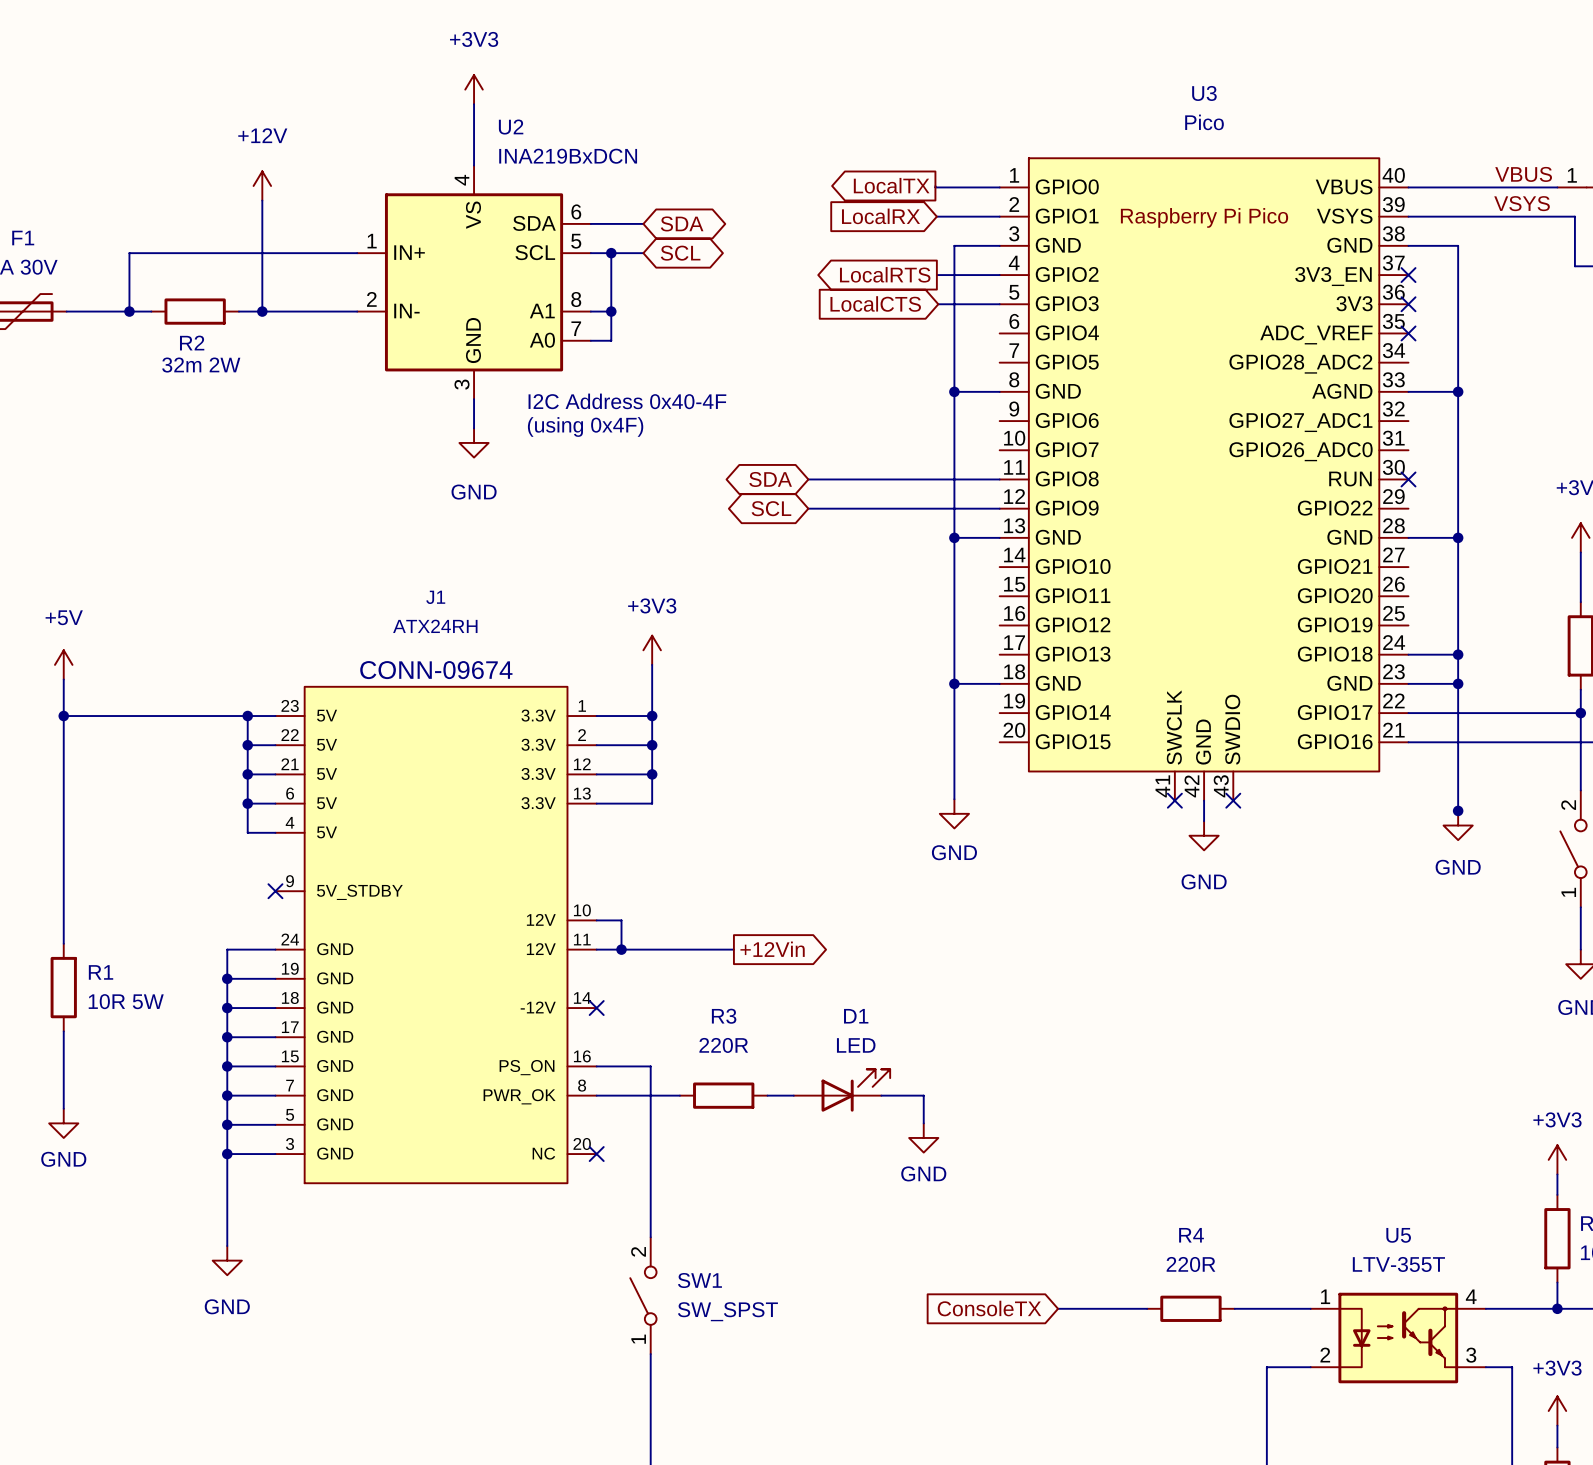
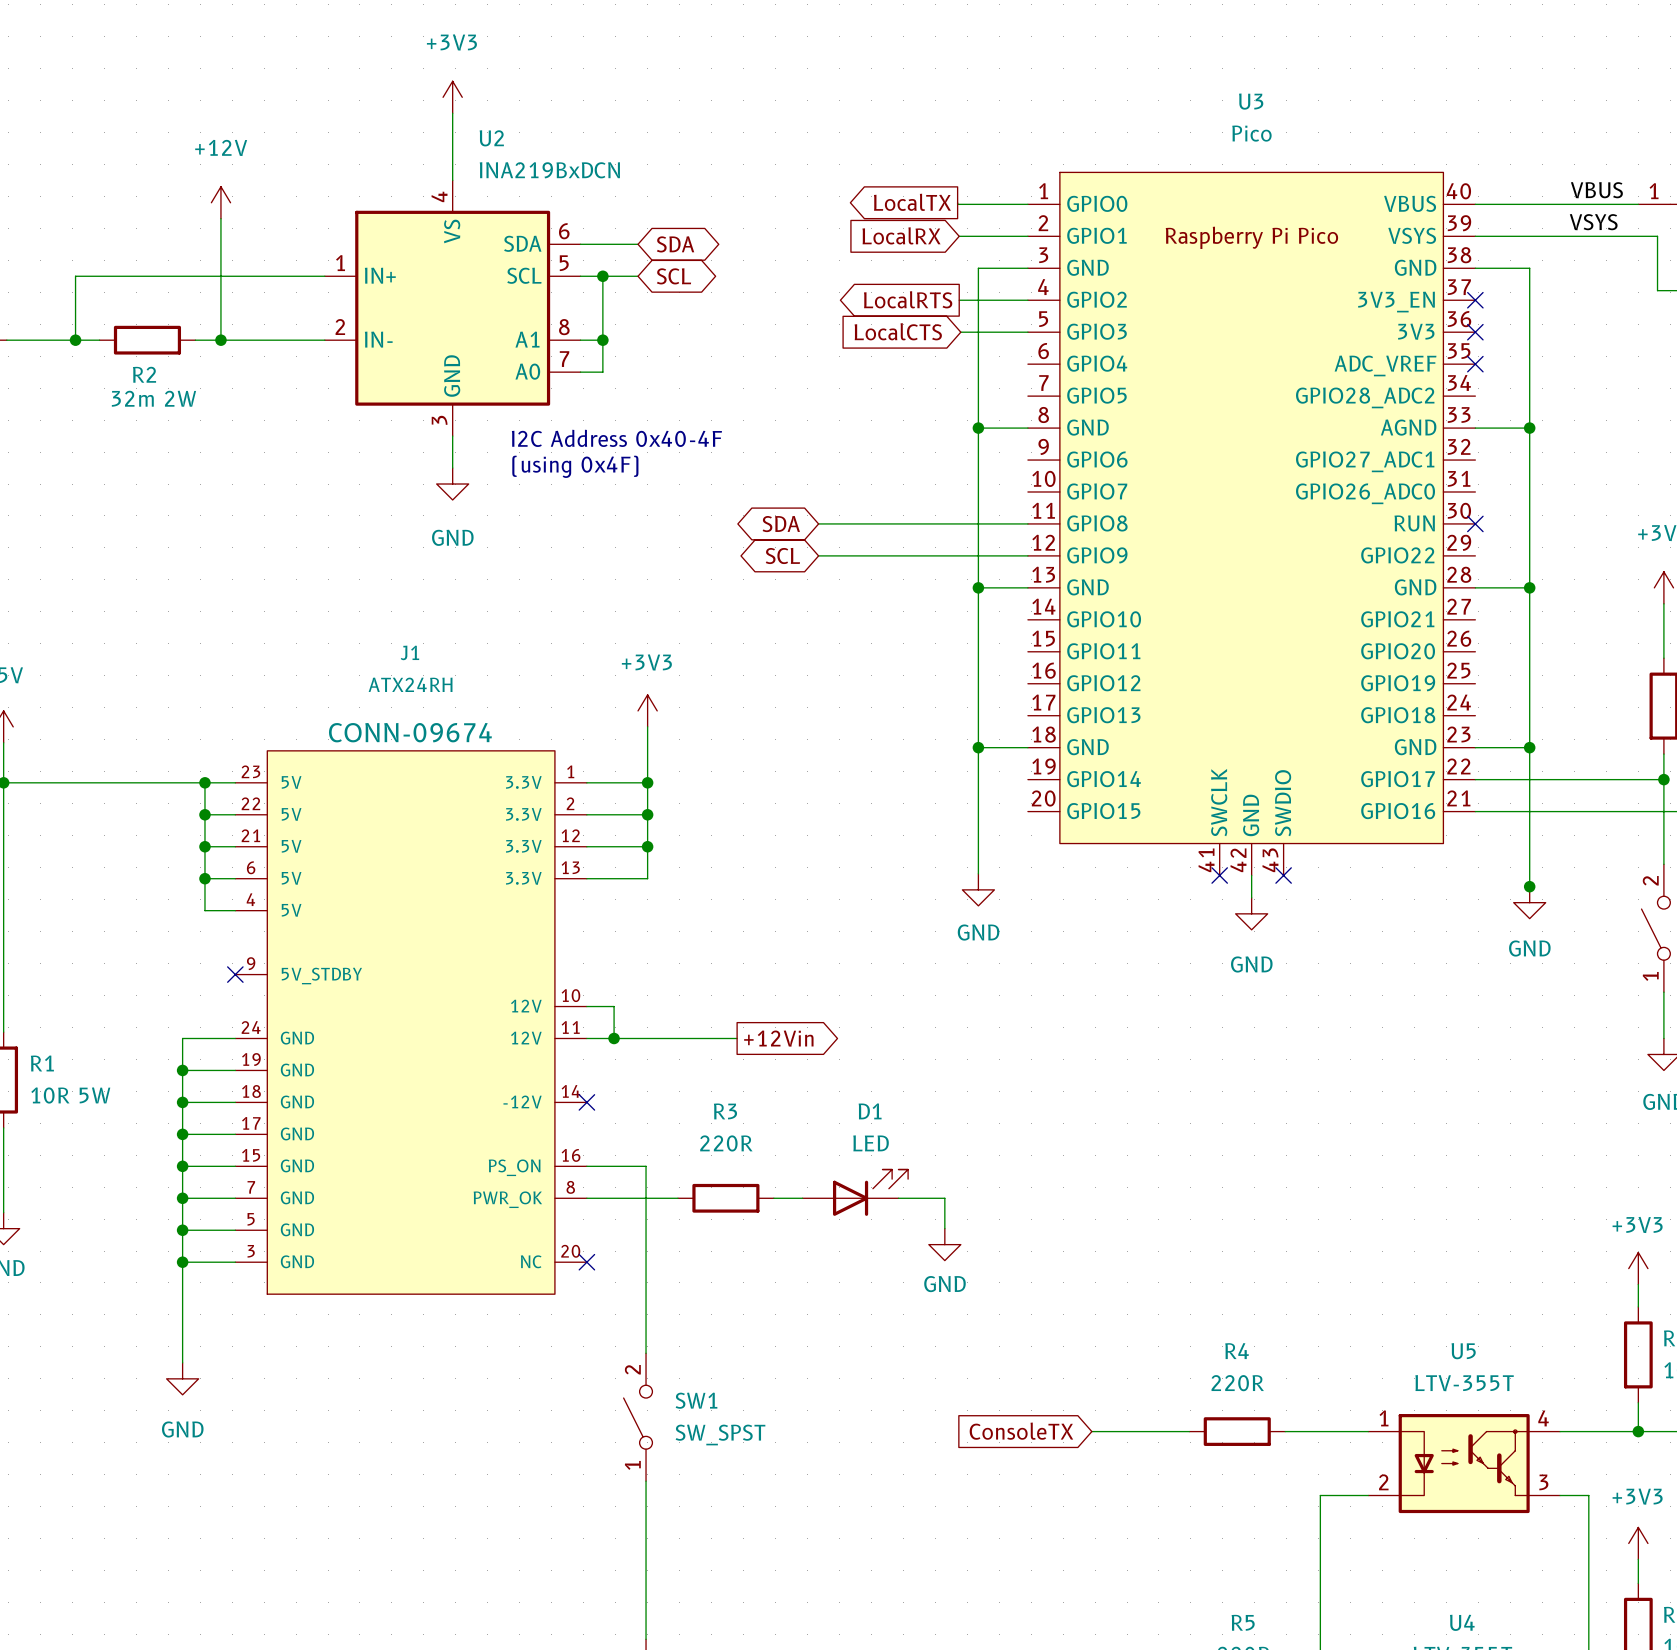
wire: (1408, 654) (1458, 654) -> none
junction: (1458, 654) -> none

